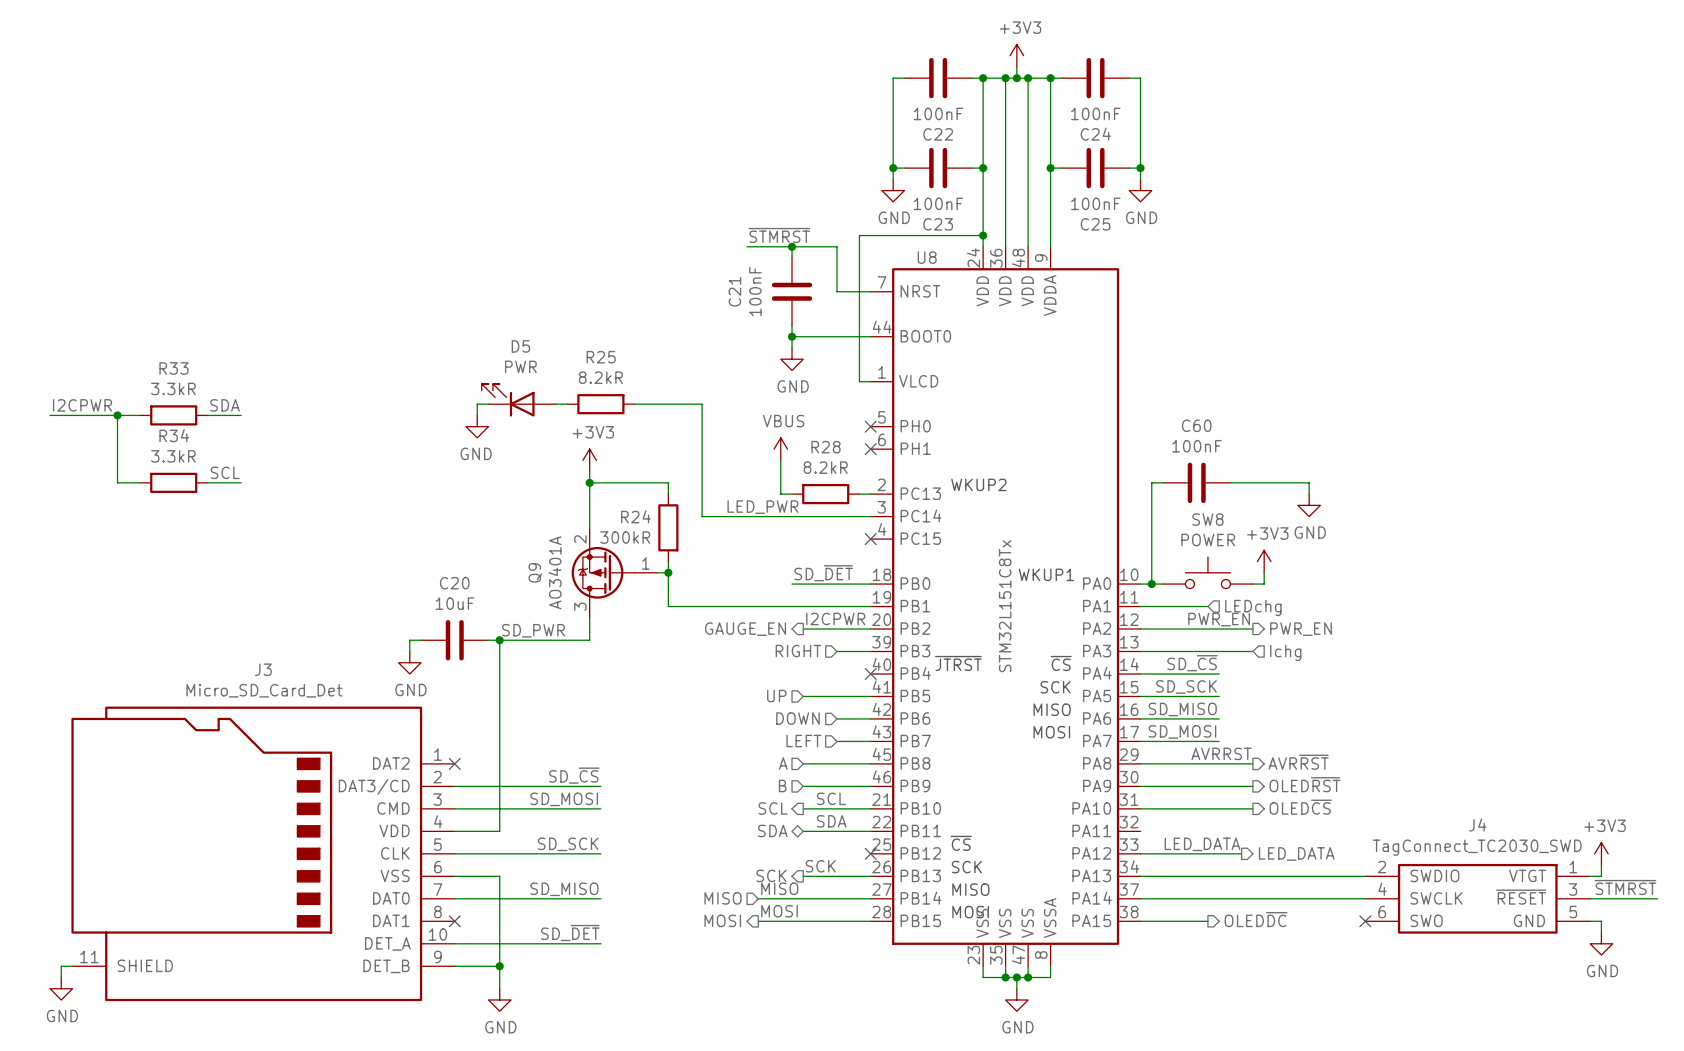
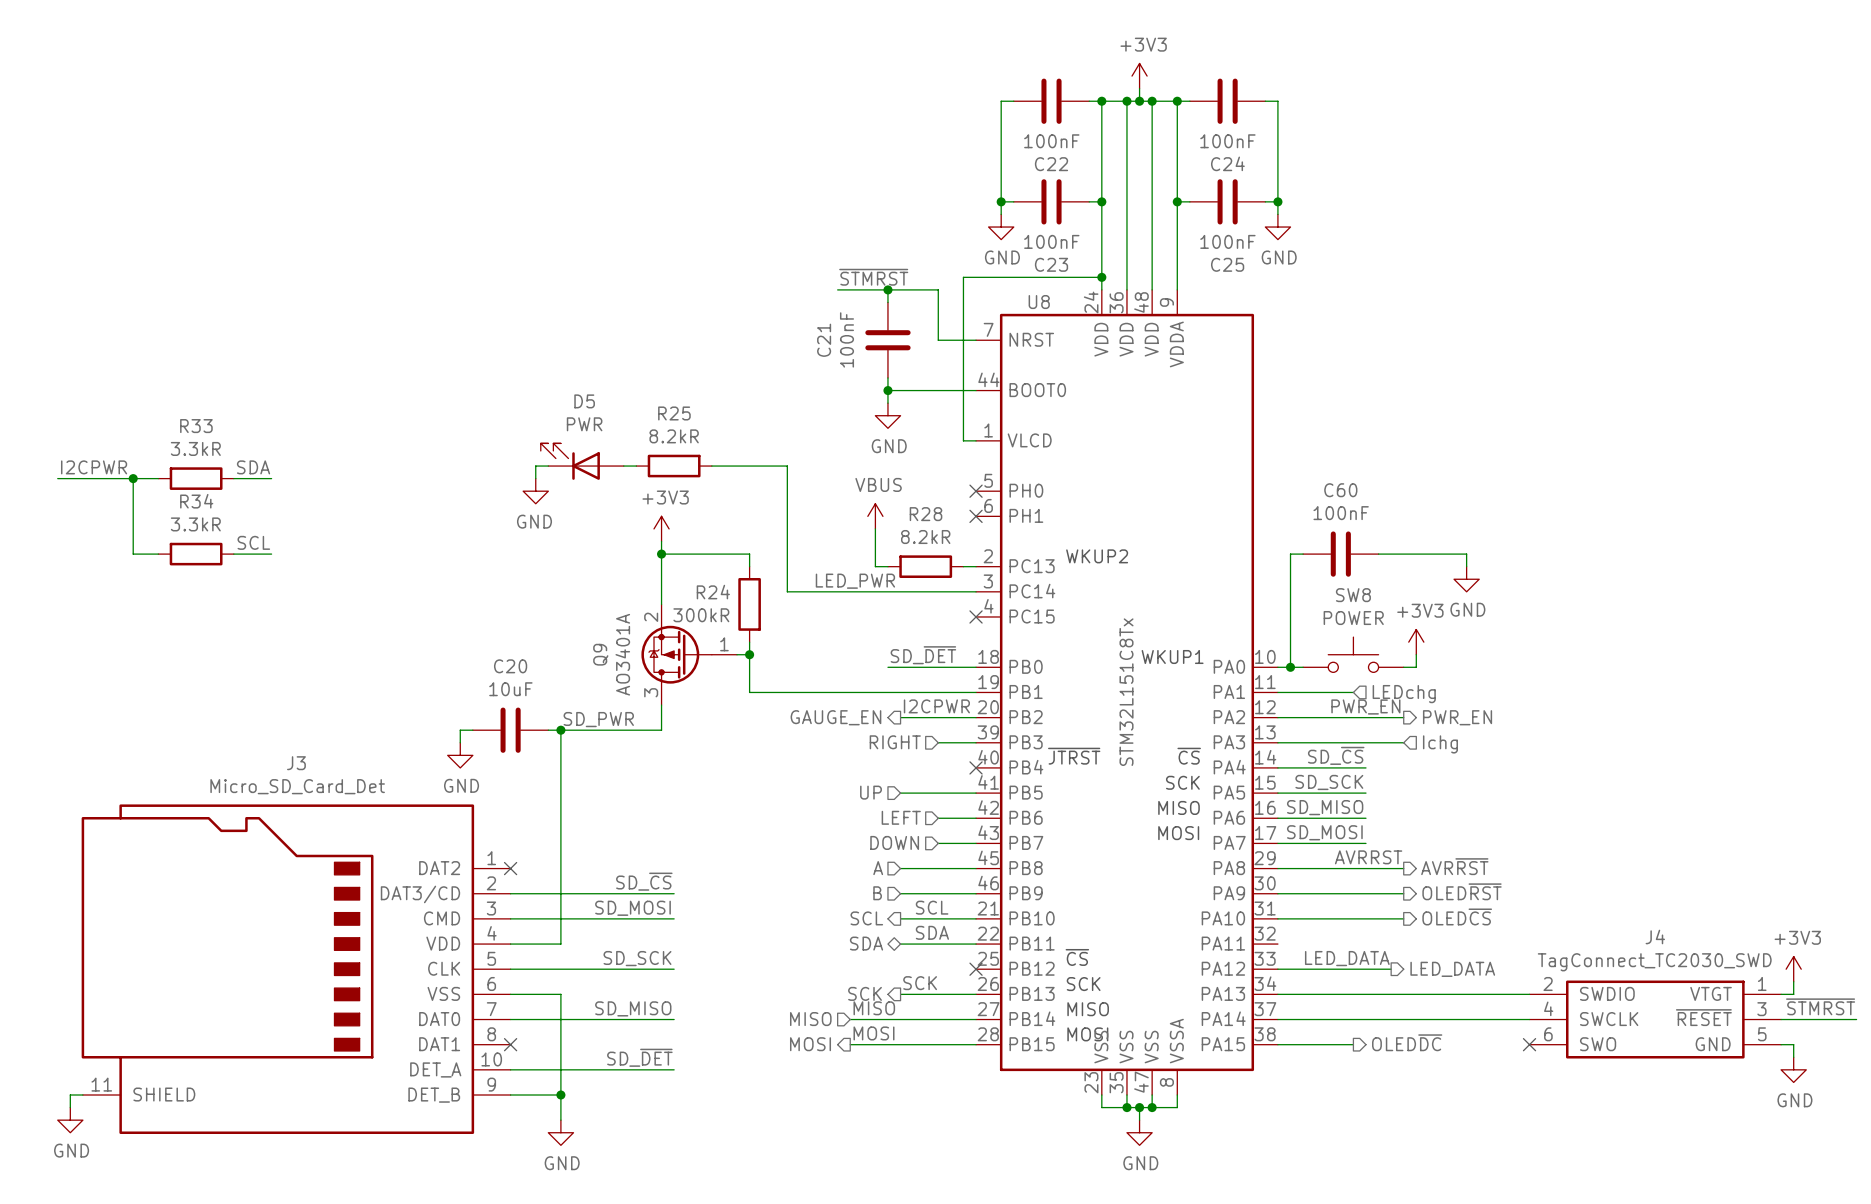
hierarchical label: DOWN (797, 718) -> LEFT (901, 817)
hierarchical label: LEFT (803, 741) -> DOWN (894, 842)

